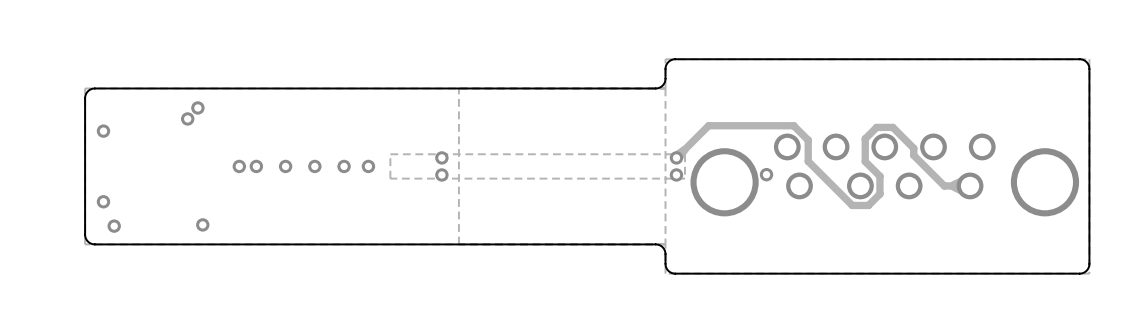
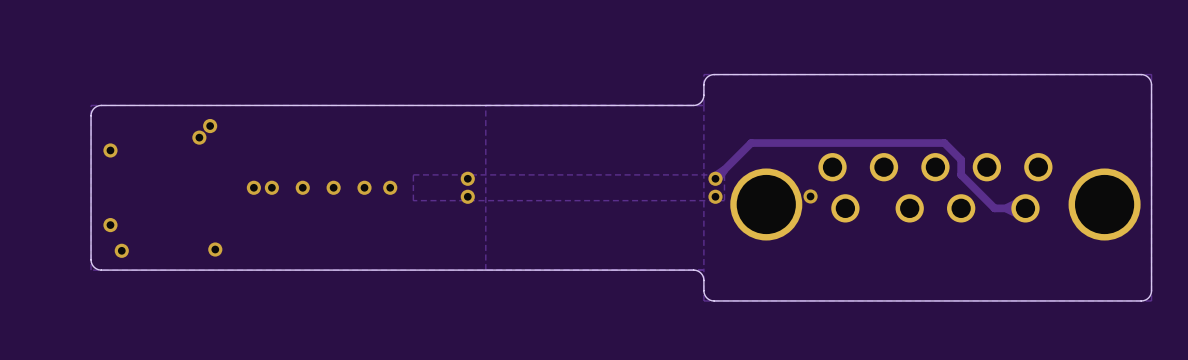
track: (708, 125) (793, 125) (808, 140) (808, 161) (852, 205) (868, 205) (879, 194) (879, 176) (865, 161) (865, 138) (876, 127) (892, 127) (913, 148) (913, 155) (944, 185) -> (749, 144) (751, 143) (944, 143) (961, 159) (961, 174) (994, 208) (998, 208)

